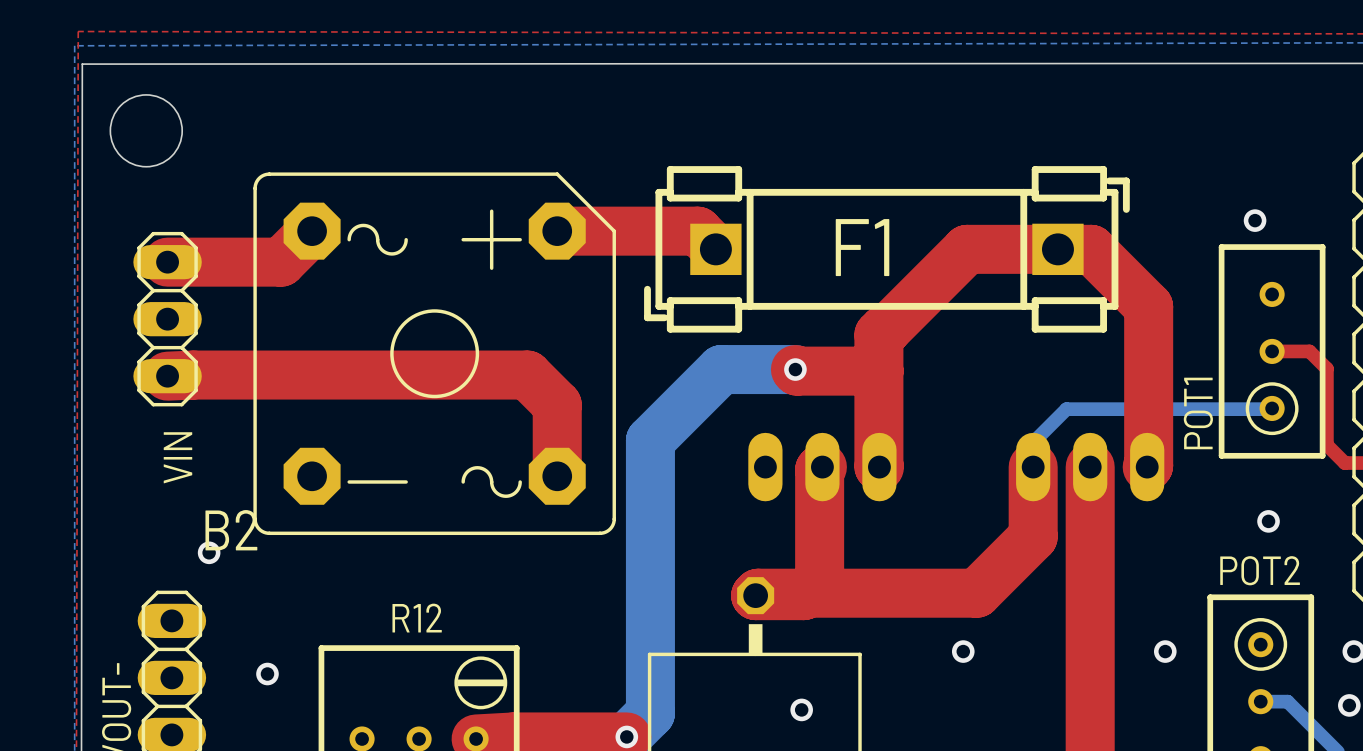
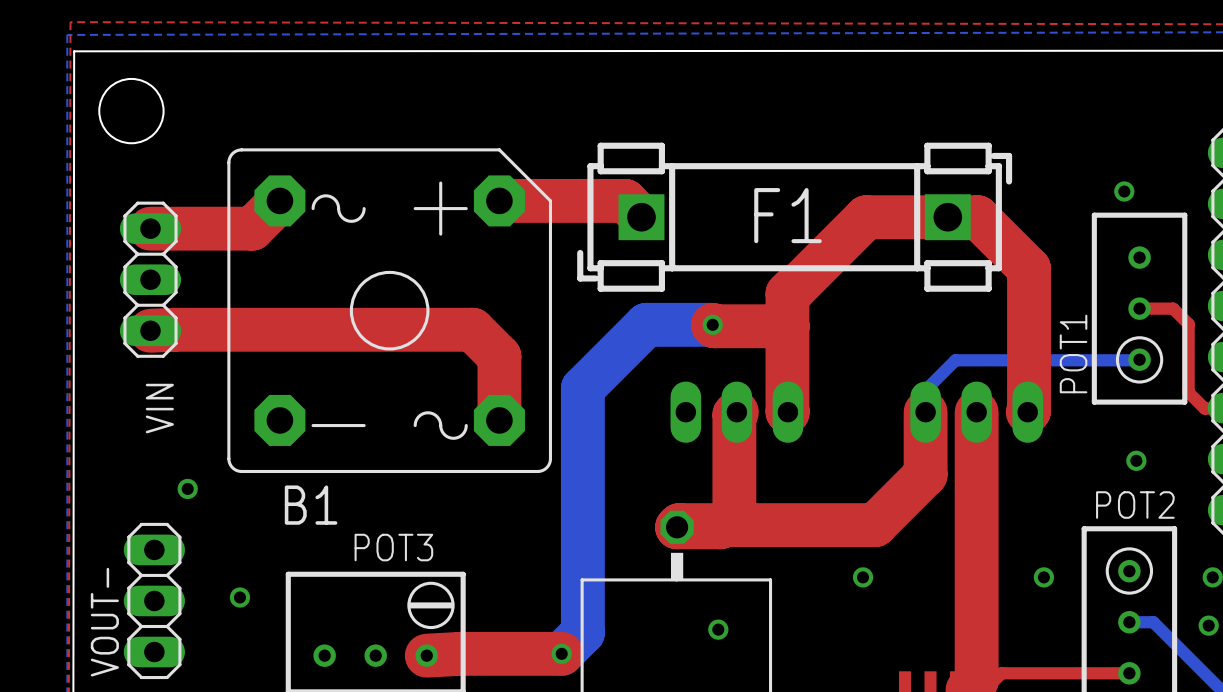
B2 name: B2 (231, 530) -> B1 (311, 505)
R12 name: R12 (417, 618) -> POT3 (393, 547)

